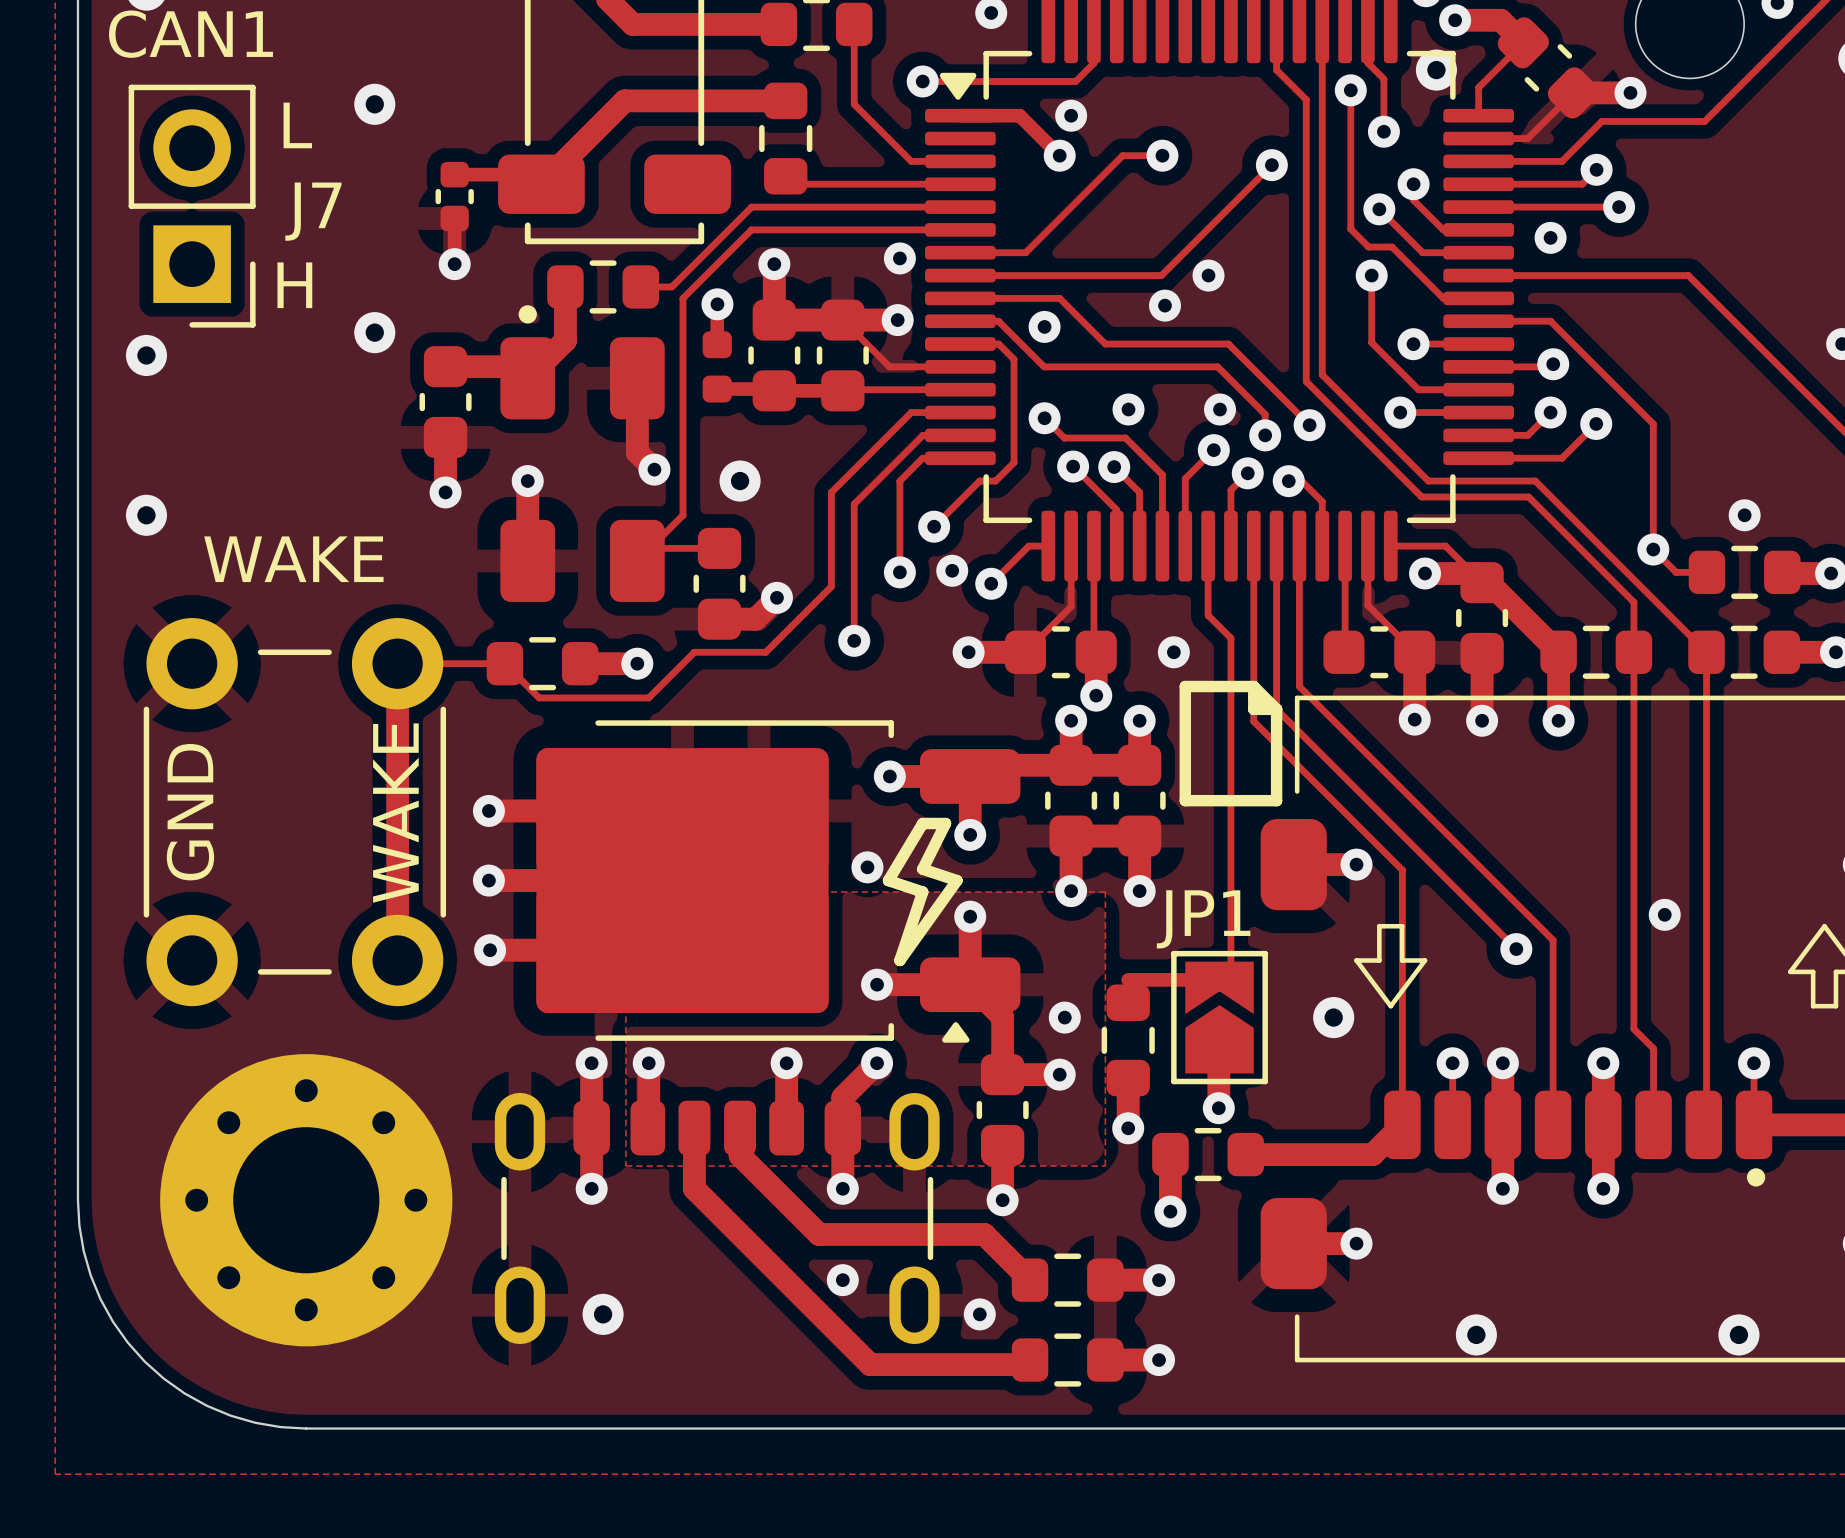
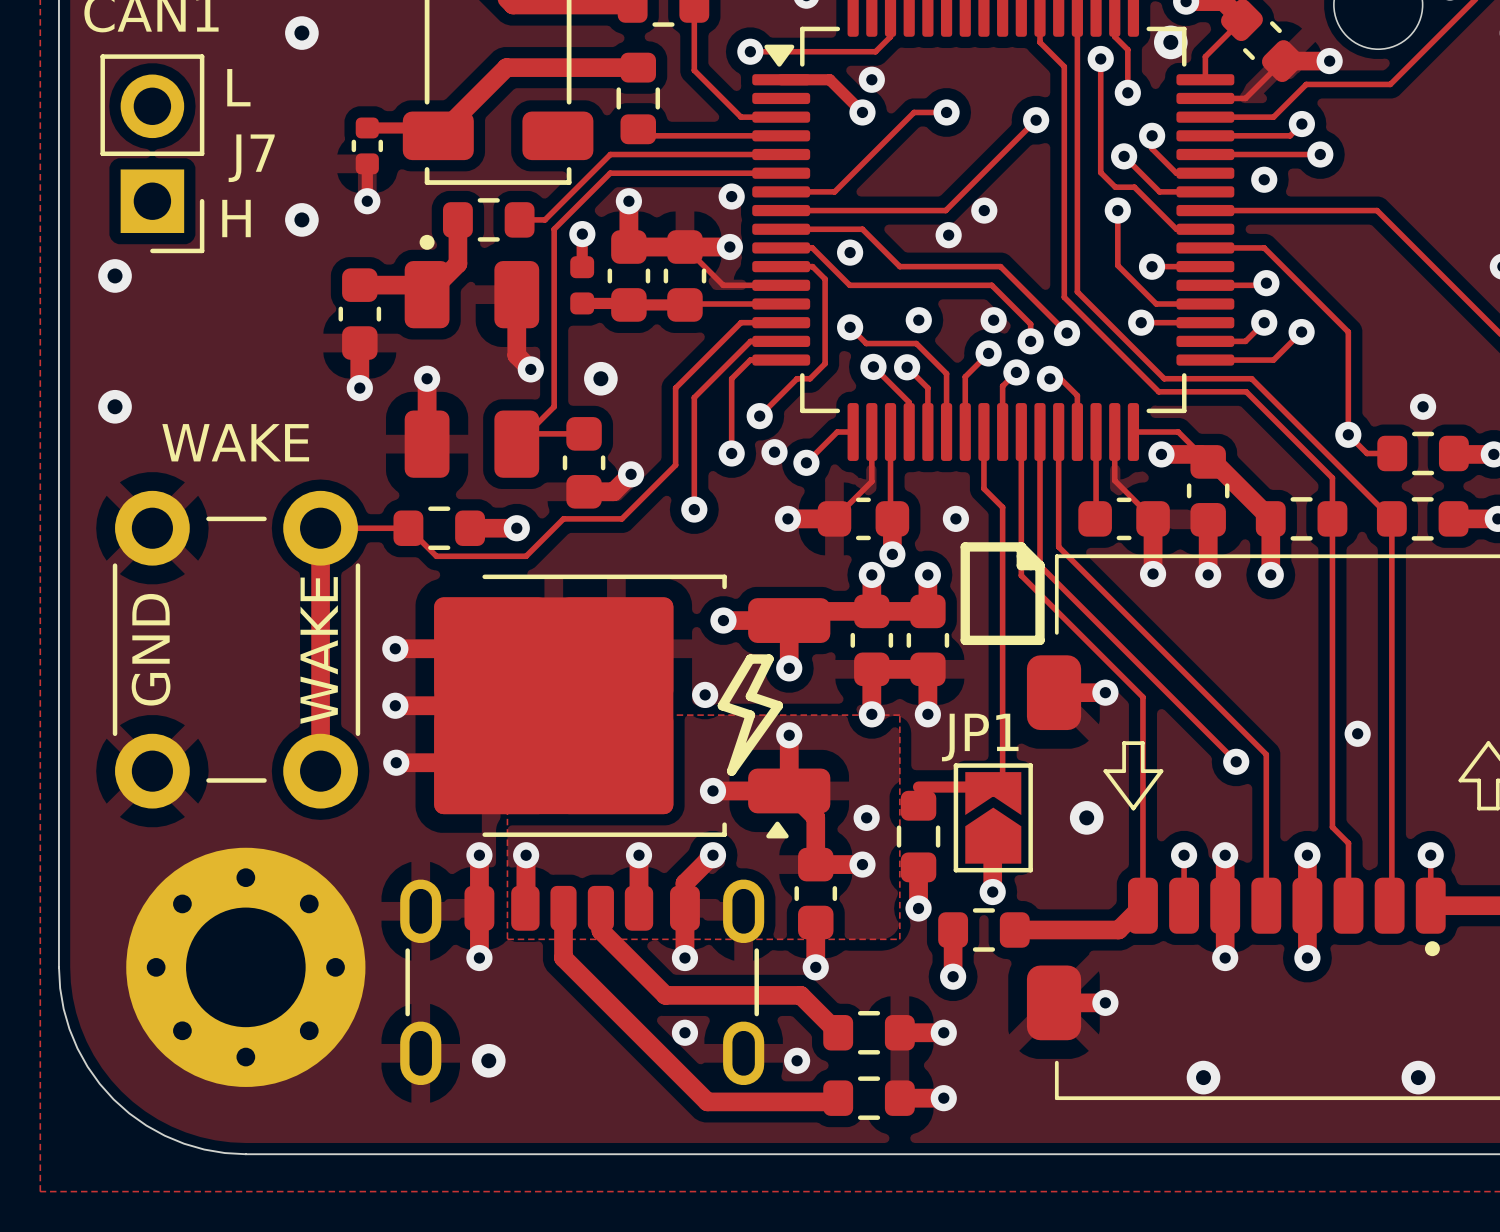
via position: (374, 104) -> (301, 33)
via position: (374, 332) -> (301, 219)

